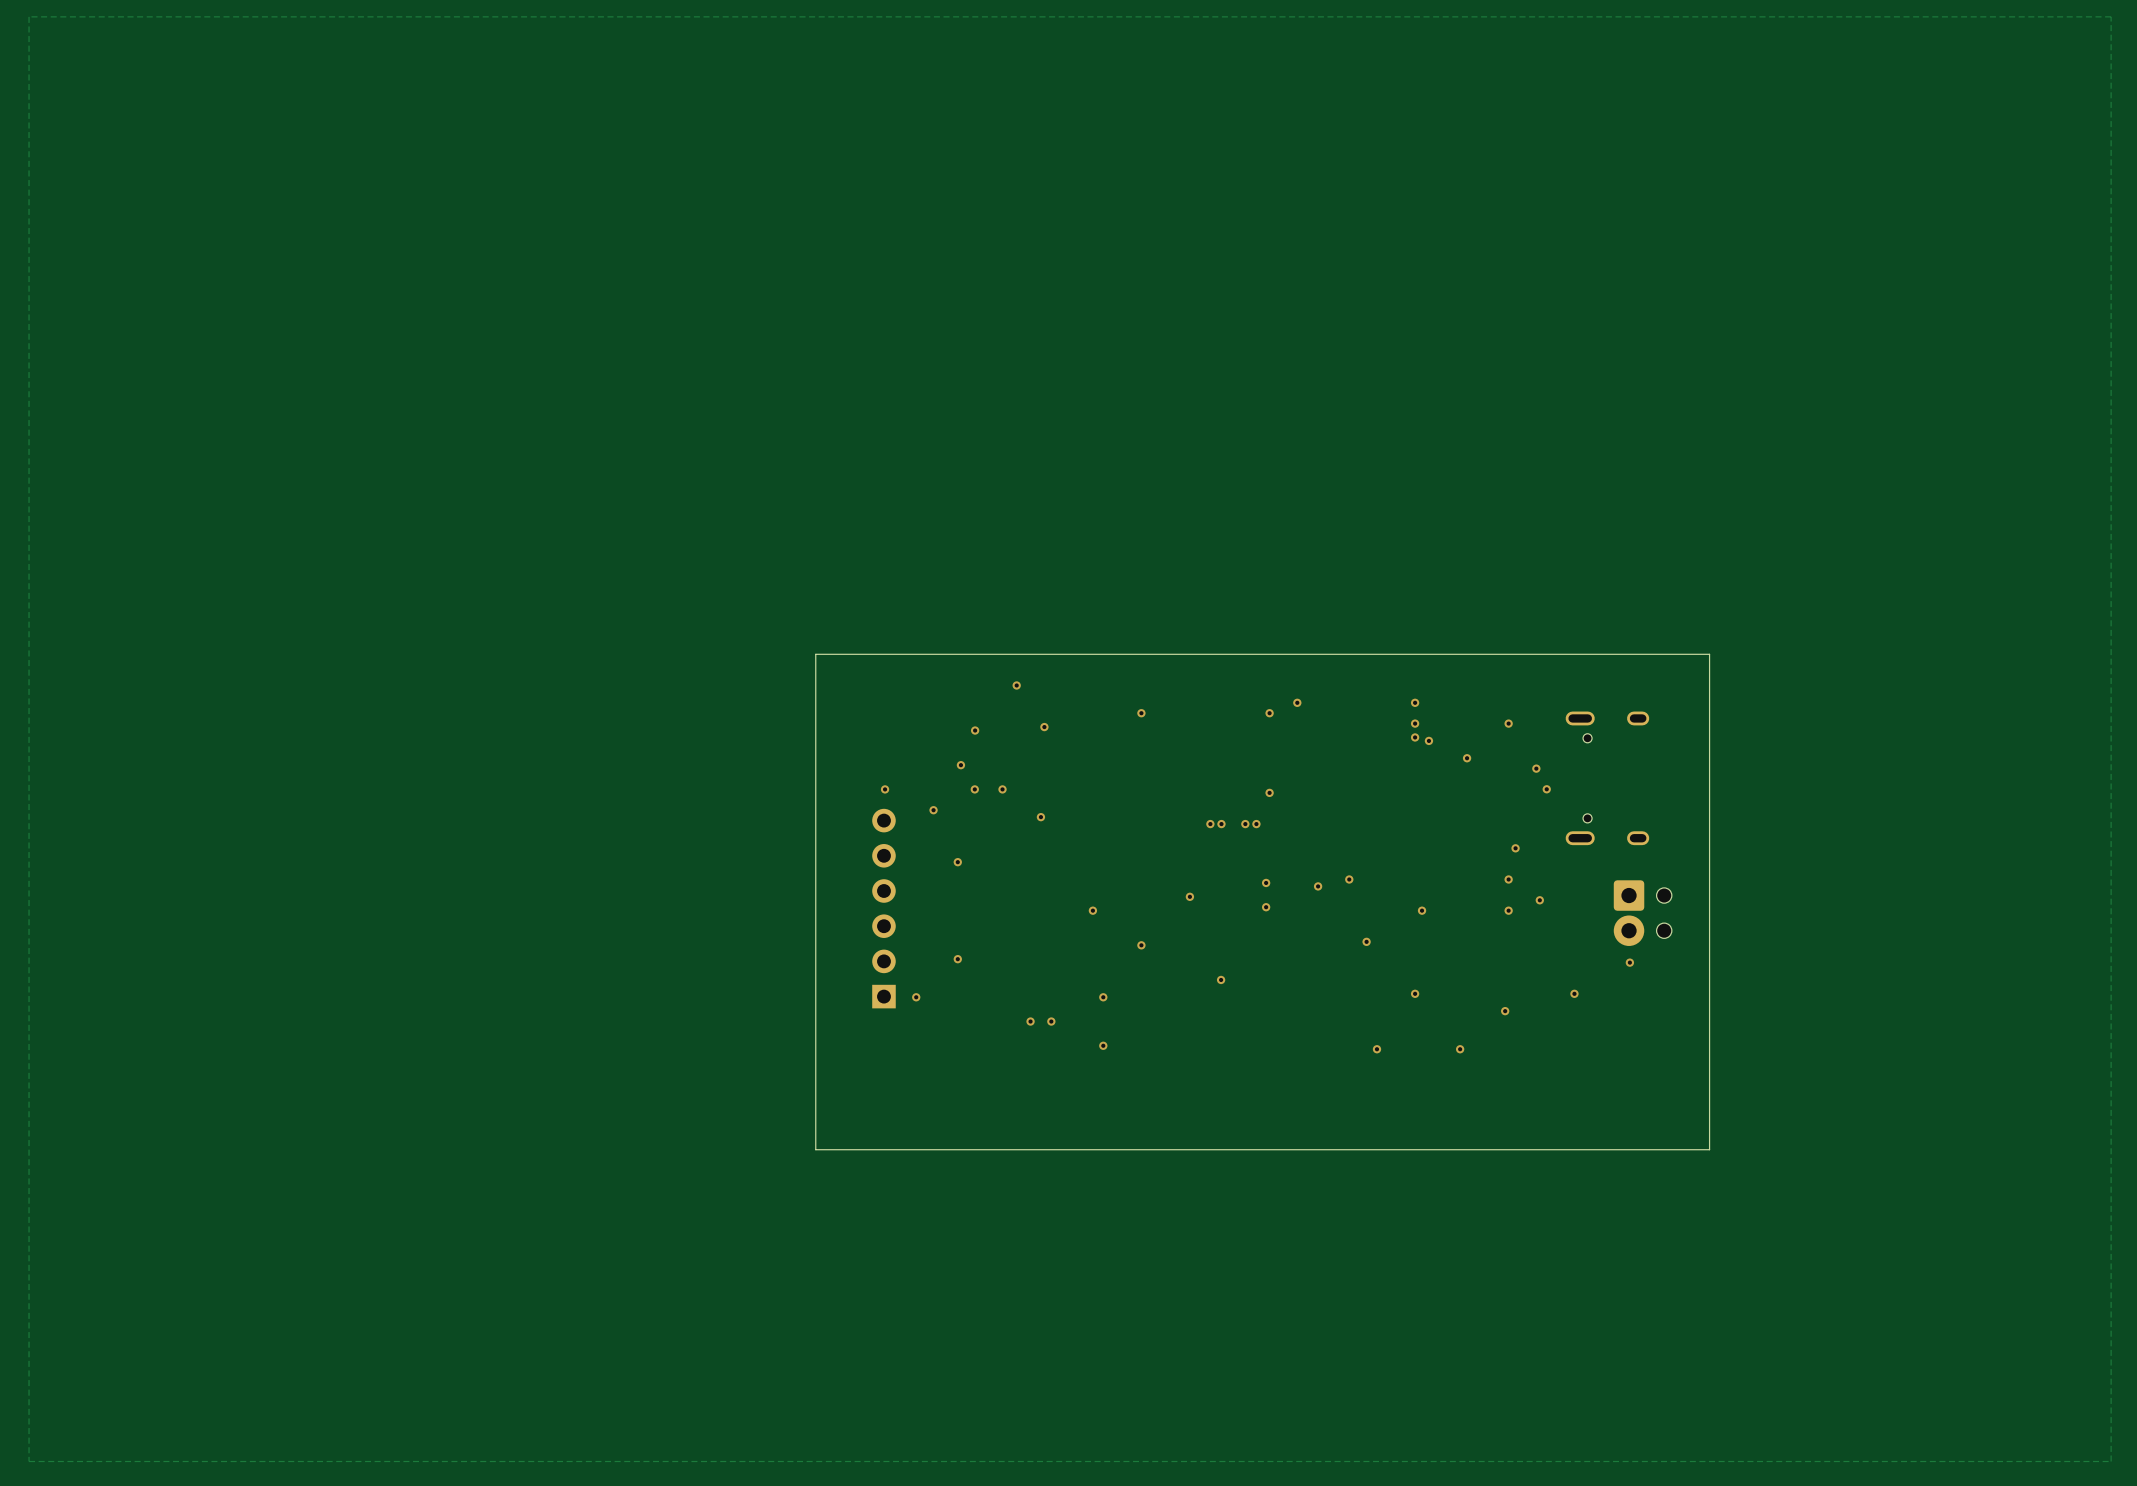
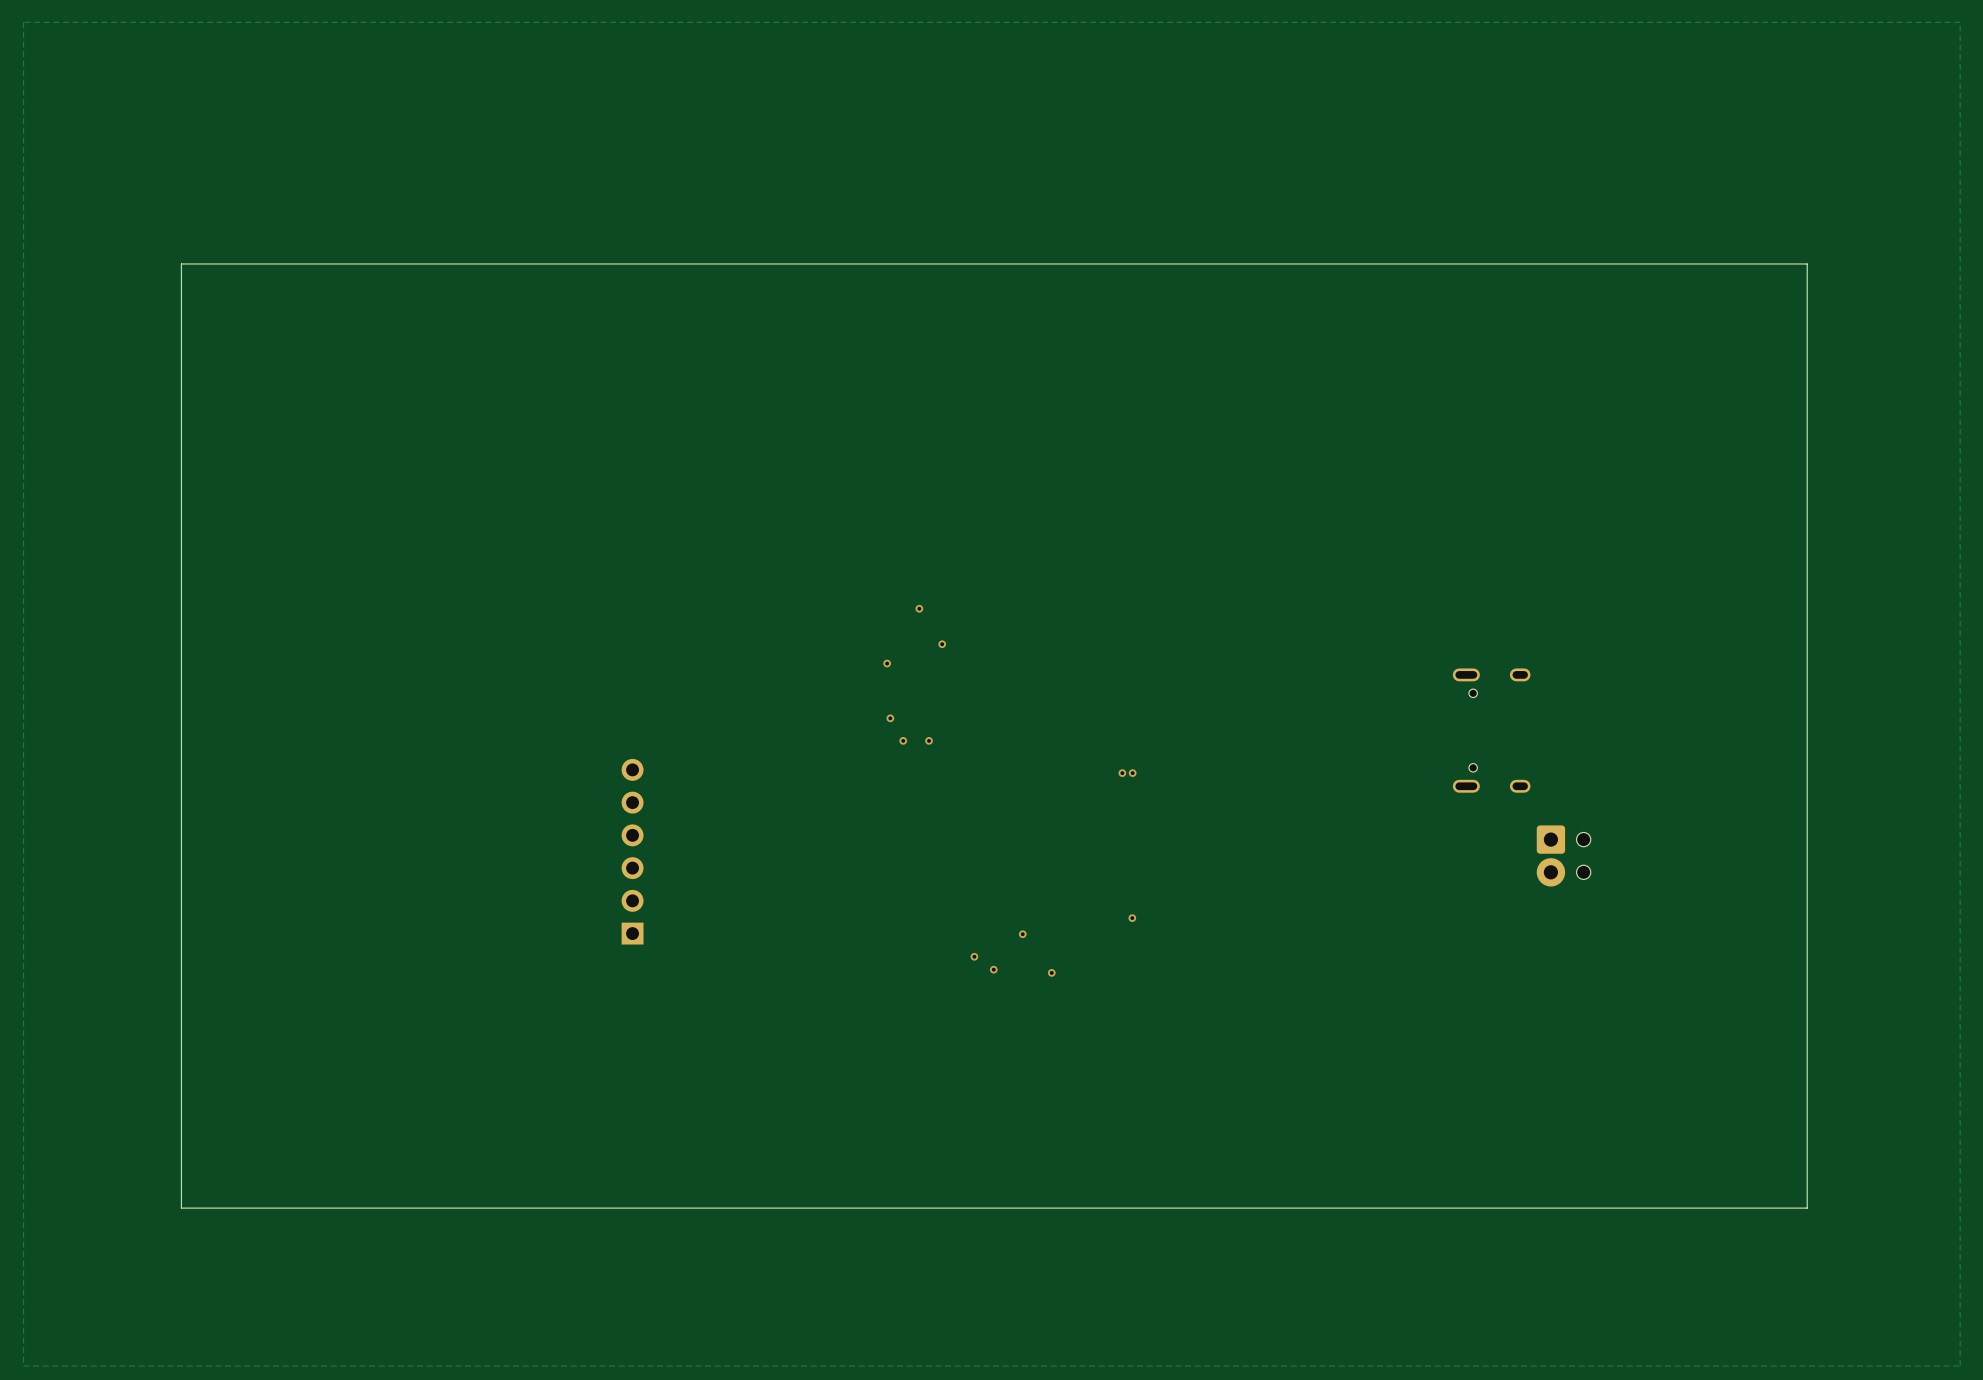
board edge: none -> (1807, 263) (181, 263) (181, 1208) (1807, 1208) (1807, 263)
via: none -> (919, 608)
board edge: (1709, 654) (815, 654) (815, 1149) (1709, 1149) (1709, 654) -> none
via: (1297, 702) -> none
via: (1415, 702) -> none
via: (1141, 713) -> none
via: (1269, 713) -> none
via: (1415, 723) -> none
via: (1508, 723) -> none
via: (1044, 727) -> none
via position: (975, 730) -> (887, 663)
via: (1415, 737) -> none
via: (1428, 740) -> none
via: (1467, 758) -> none
via: (1536, 768) -> none
via: (885, 789) -> none
via: (1546, 789) -> none
via: (1269, 792) -> none
via: (933, 810) -> none
via: (1040, 817) -> none
via: (1245, 824) -> none
via: (1256, 824) -> none
via: (1515, 848) -> none
via: (957, 862) -> none
via: (1349, 879) -> none
via: (1508, 879) -> none
via: (1266, 882) -> none
via: (1318, 886) -> none
via: (1189, 896) -> none
via: (1539, 900) -> none
via: (1266, 907) -> none
part position: (883, 908) -> (632, 851)
via: (1092, 910) -> none
via: (1422, 910) -> none
via: (1508, 910) -> none
part position: (1642, 913) -> (1563, 855)
via: (1366, 941) -> none
via: (1141, 945) -> none
via: (957, 959) -> none
via: (1629, 962) -> none
via: (1415, 993) -> none
via: (1574, 993) -> none
via: (916, 997) -> none
via: (1505, 1011) -> none
via: (1030, 1021) -> none
via: none -> (993, 969)
via: none -> (1051, 972)
via: (1103, 1045) -> none
via: (1376, 1049) -> none
via: (1460, 1049) -> none

